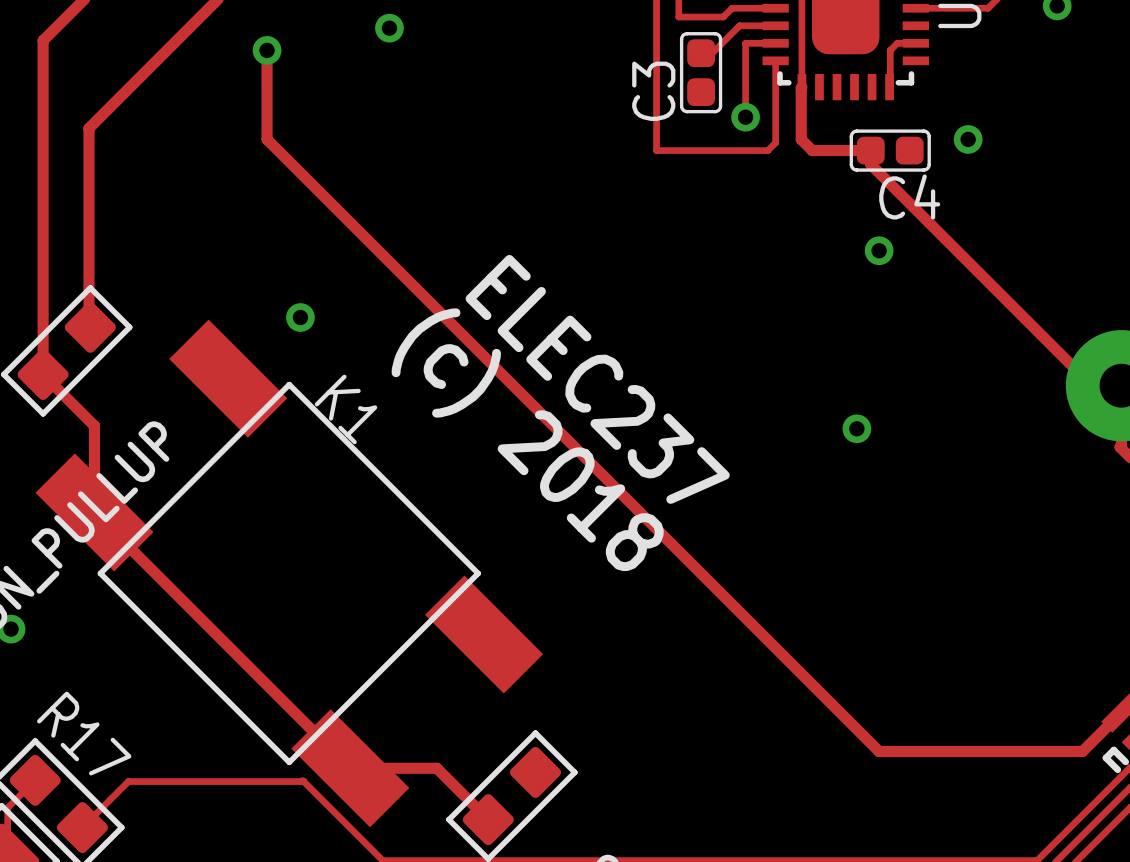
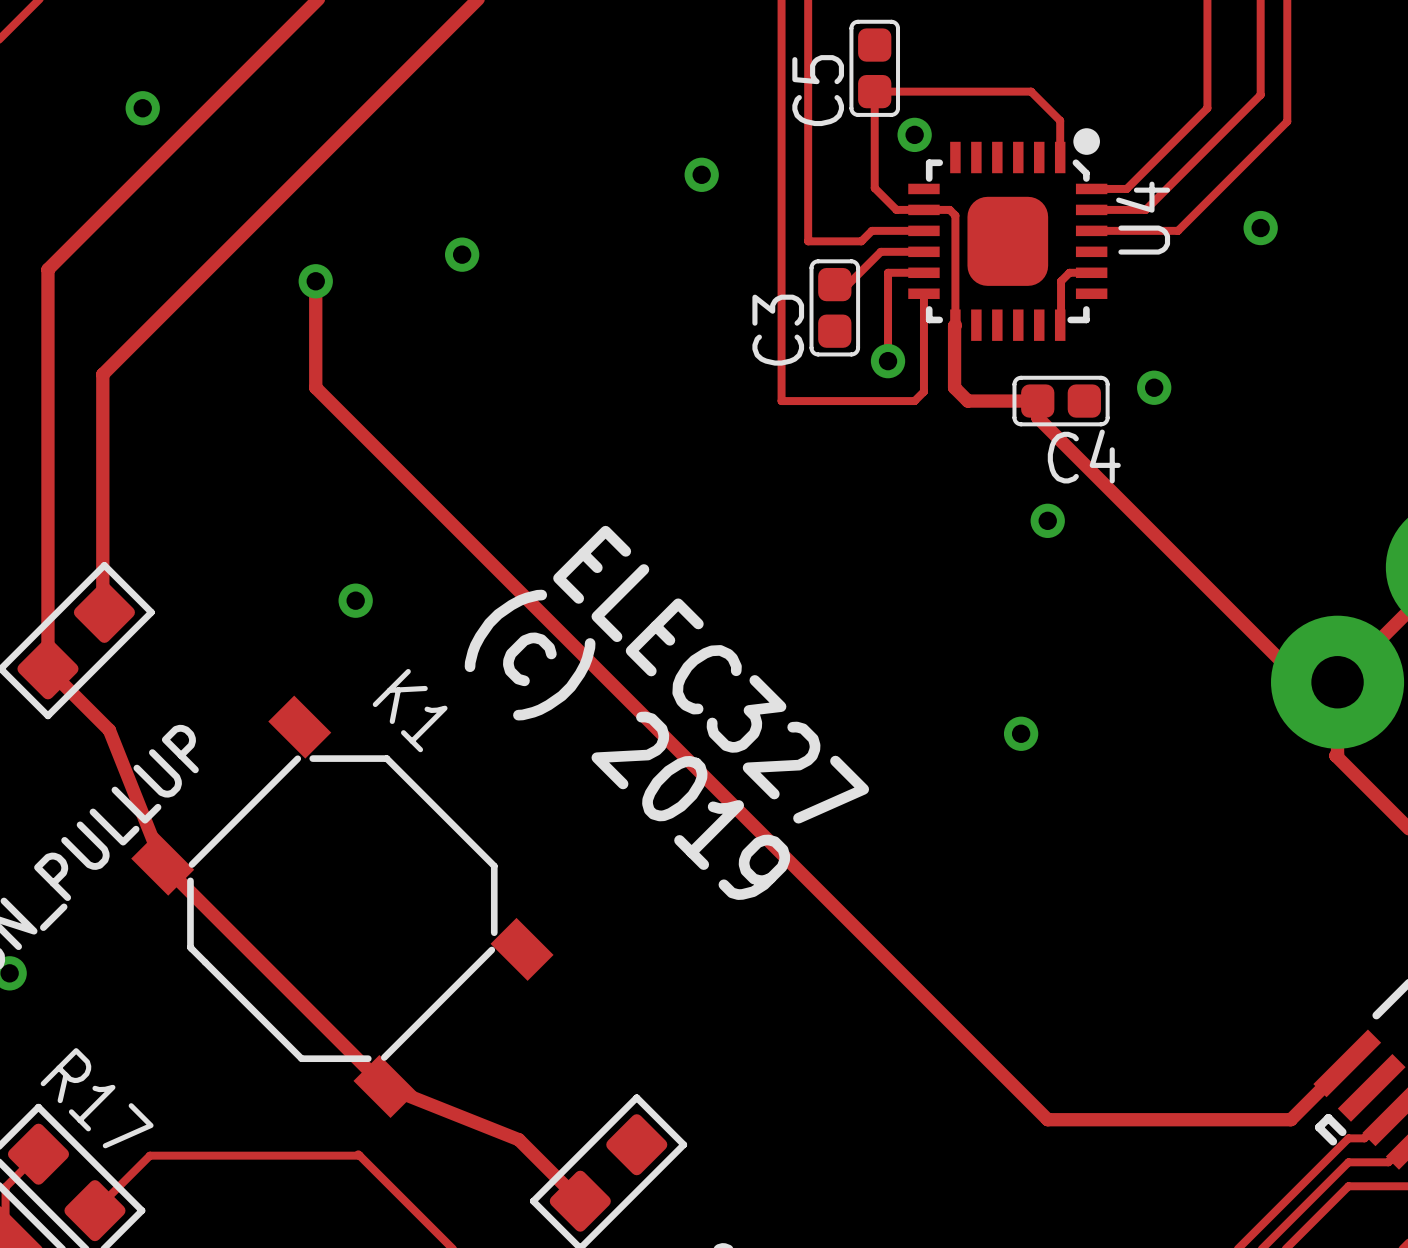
K1 footprint: [35, 319, 544, 828] -> [131, 695, 554, 1118]
text: ELEC237 (597, 379) -> ELEC327 (711, 674)
track: (94, 425) (94, 512) (350, 768) (436, 768) -> (109, 730) (162, 864) (384, 1086) (518, 1139)
text: (c) 2018 (527, 439) -> (c) 2019 (627, 744)

